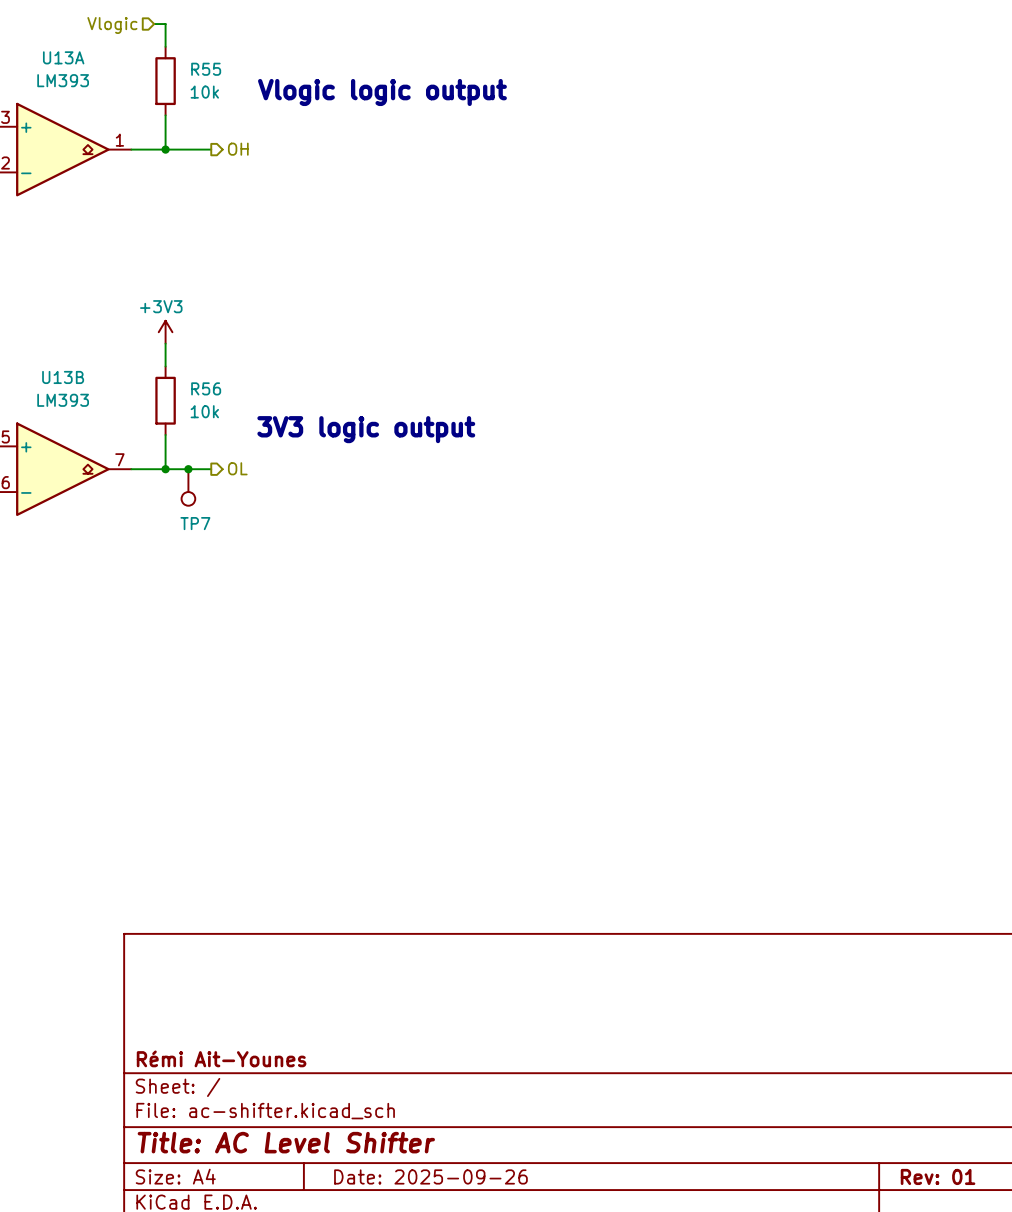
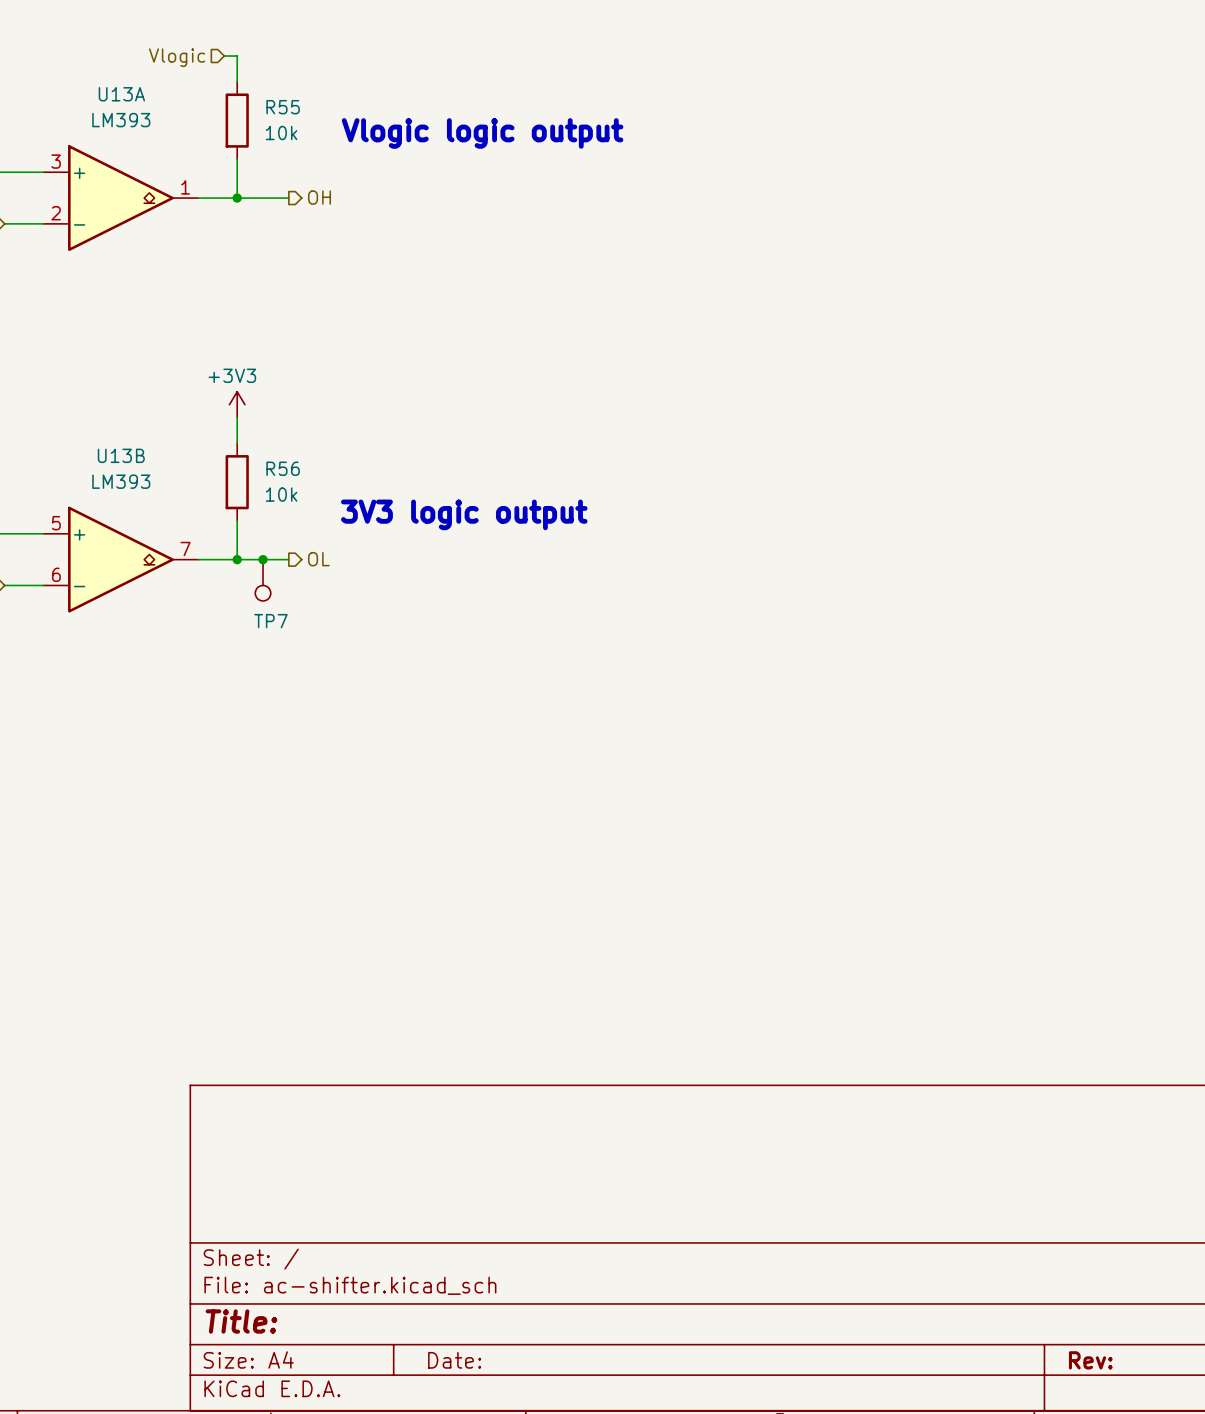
title block: Rémi Ait-Younes (221, 1058) -> none
title block: Title: AC Level Shifter (286, 1142) -> Title: (241, 1321)
title block: Date: 2025-09-26 (430, 1176) -> Date: (454, 1360)
title block: Rev: 01 (938, 1176) -> Rev: (1090, 1360)

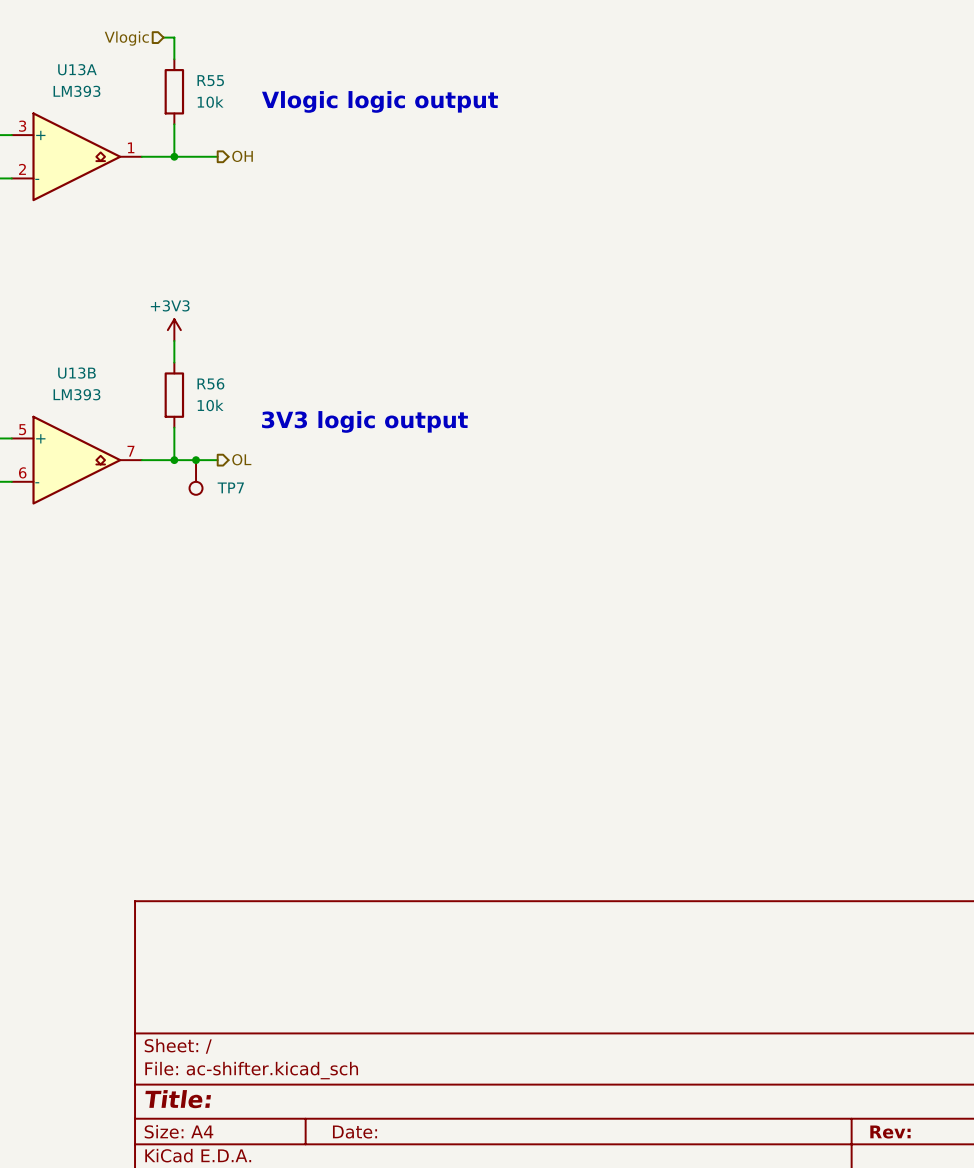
TP7 name position: TP7 (270, 621) -> TP7 (230, 487)

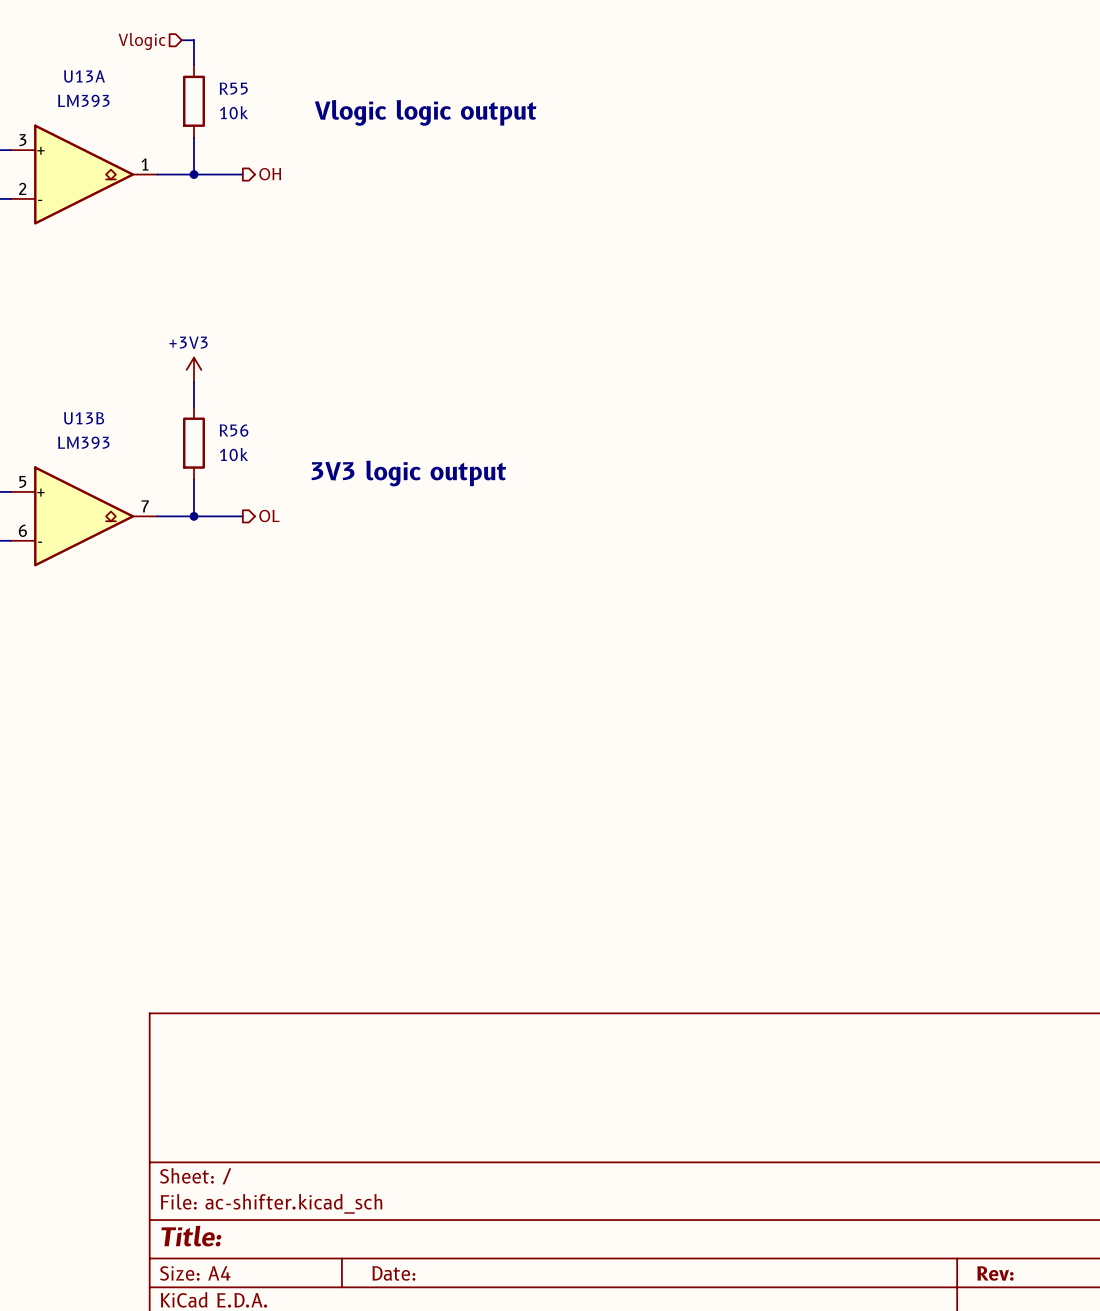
junction: (196, 460) -> none
TP7: (196, 477) -> none

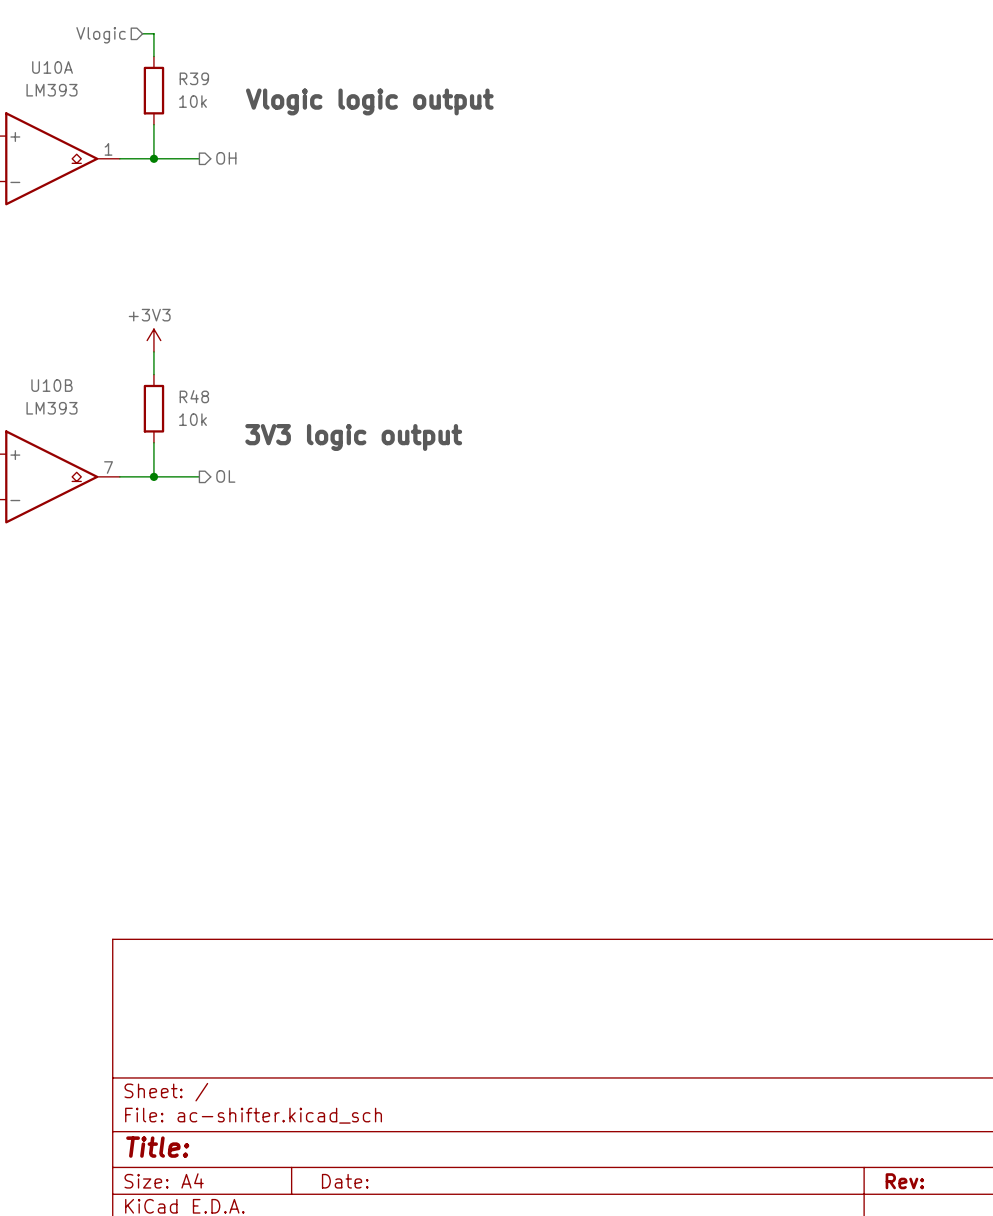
U13A name: U13A (84, 76) -> U10A (52, 67)
R55 name: R55 (233, 88) -> R39 (194, 78)
U13B name: U13B (84, 418) -> U10B (51, 385)
R56 name: R56 (234, 430) -> R48 (194, 396)

